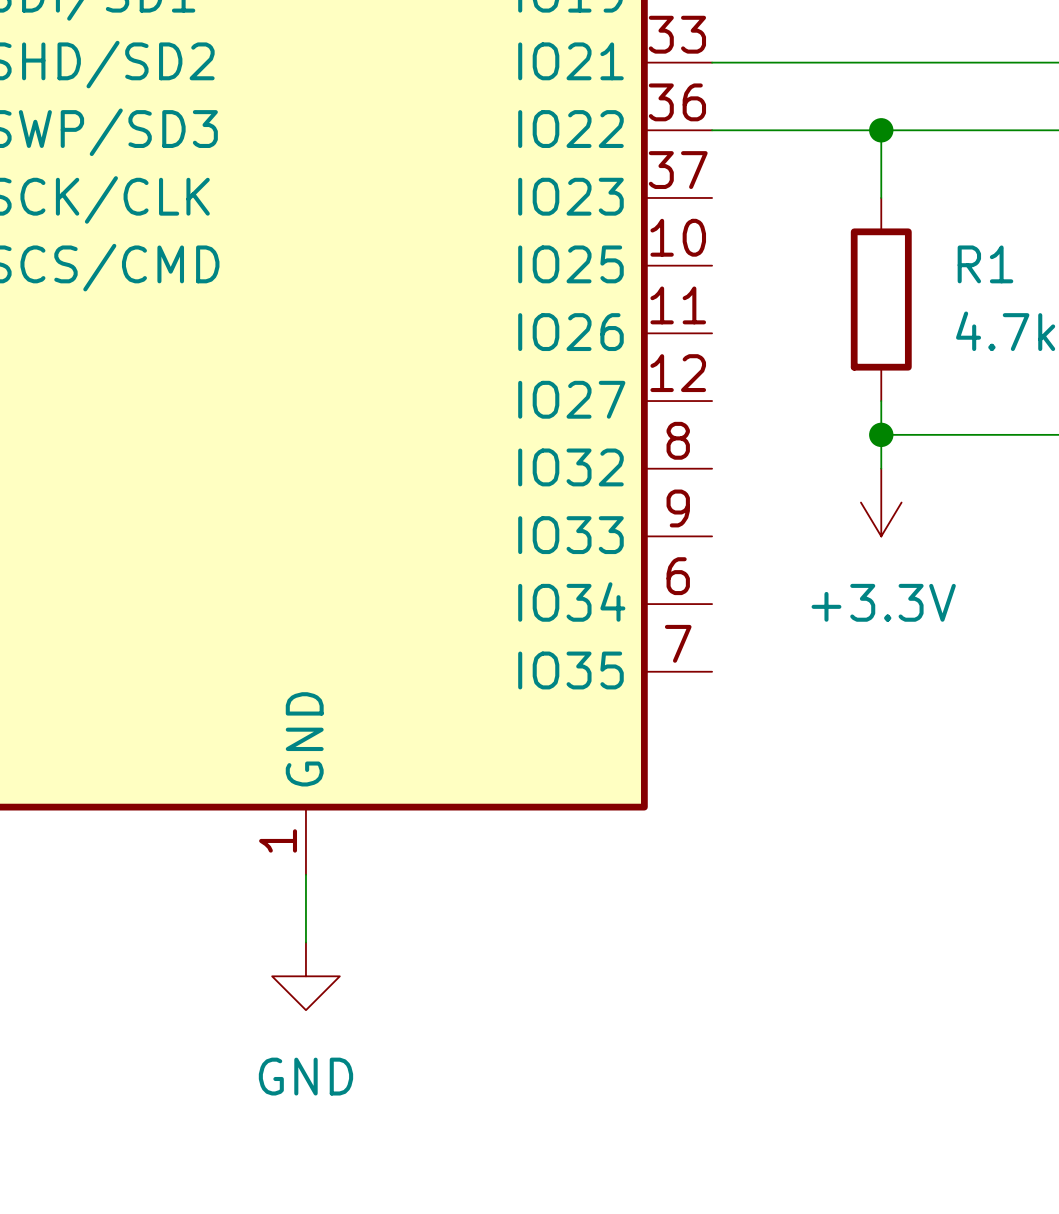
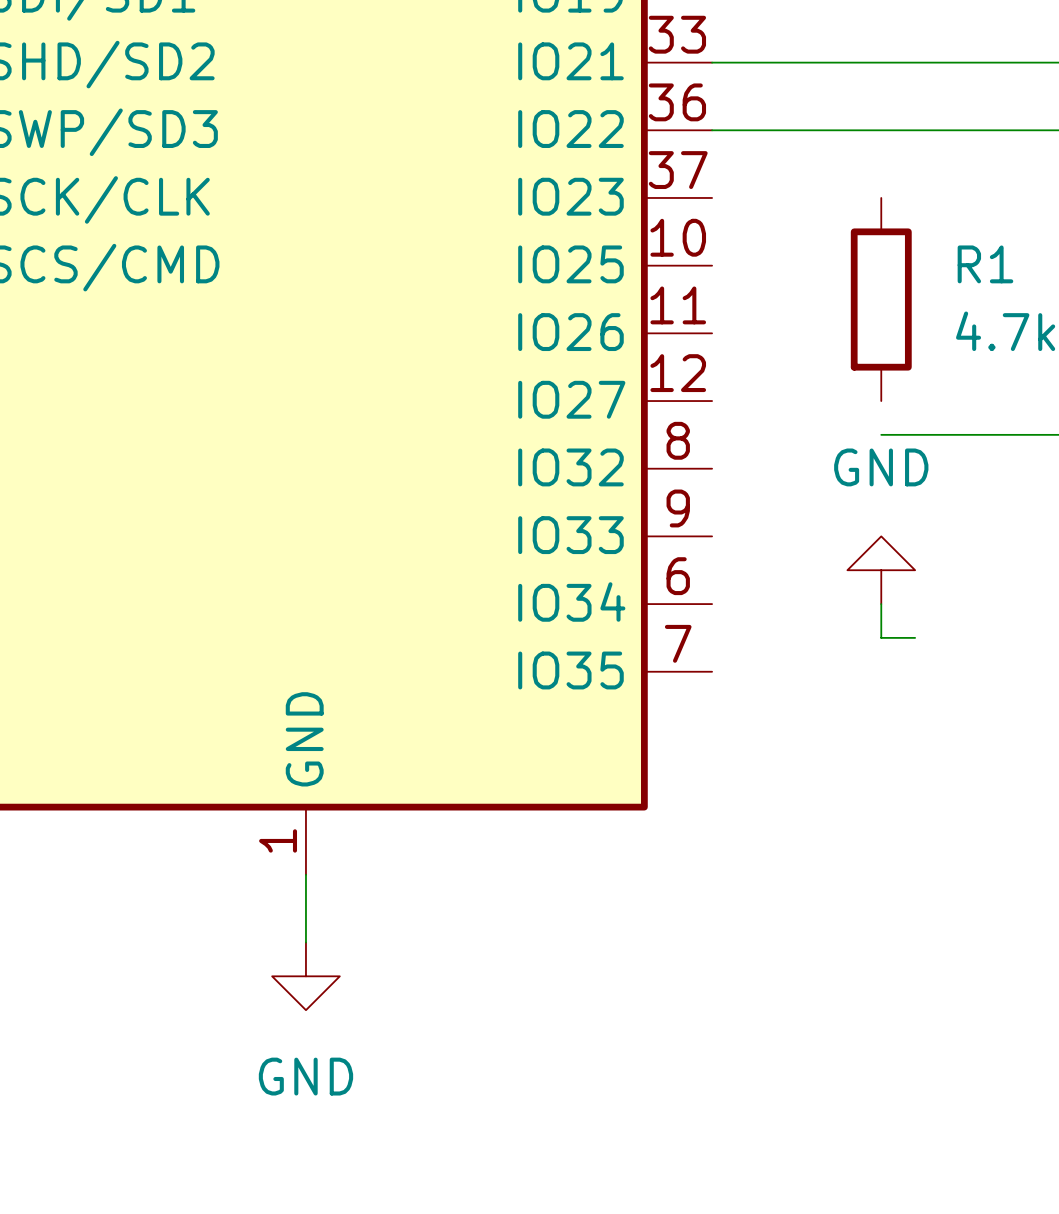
wire: (881, 130) (881, 197) -> none
junction: (881, 130) -> none
wire: (881, 401) (881, 468) -> none
junction: (881, 434) -> none
power symbol: +3.3V (881, 502) -> none
power symbol: none -> GND (881, 570)
wire: none -> (881, 604) (881, 637) (915, 637)

